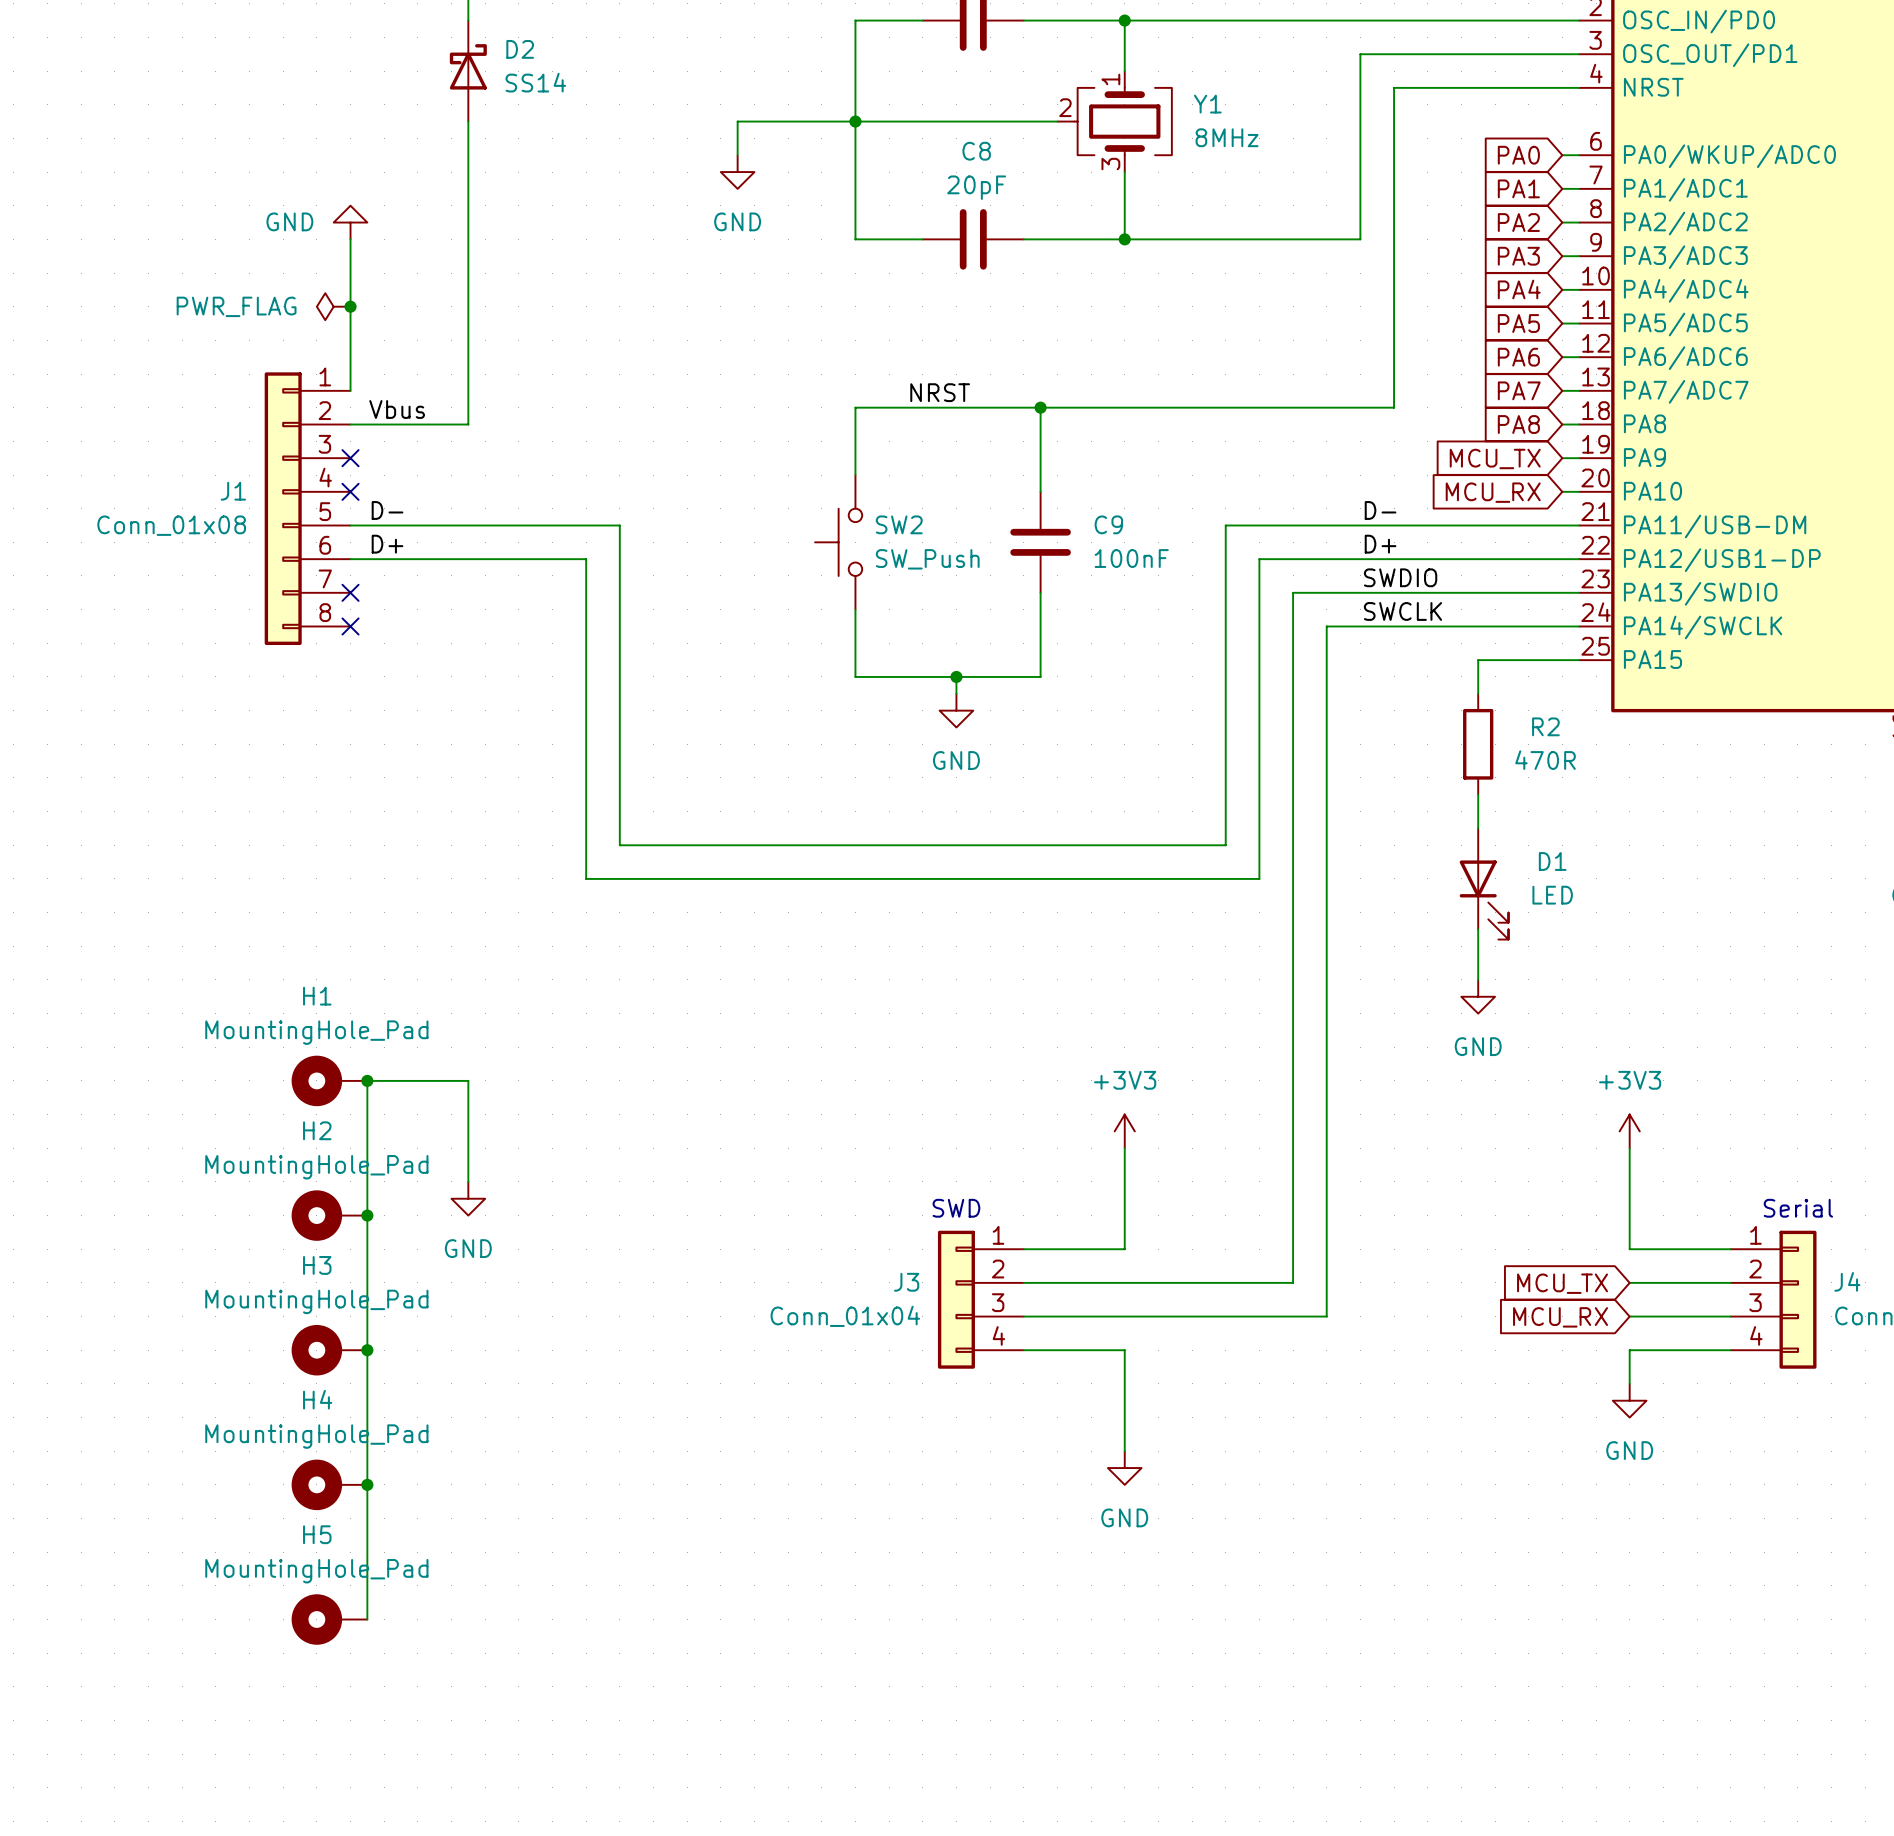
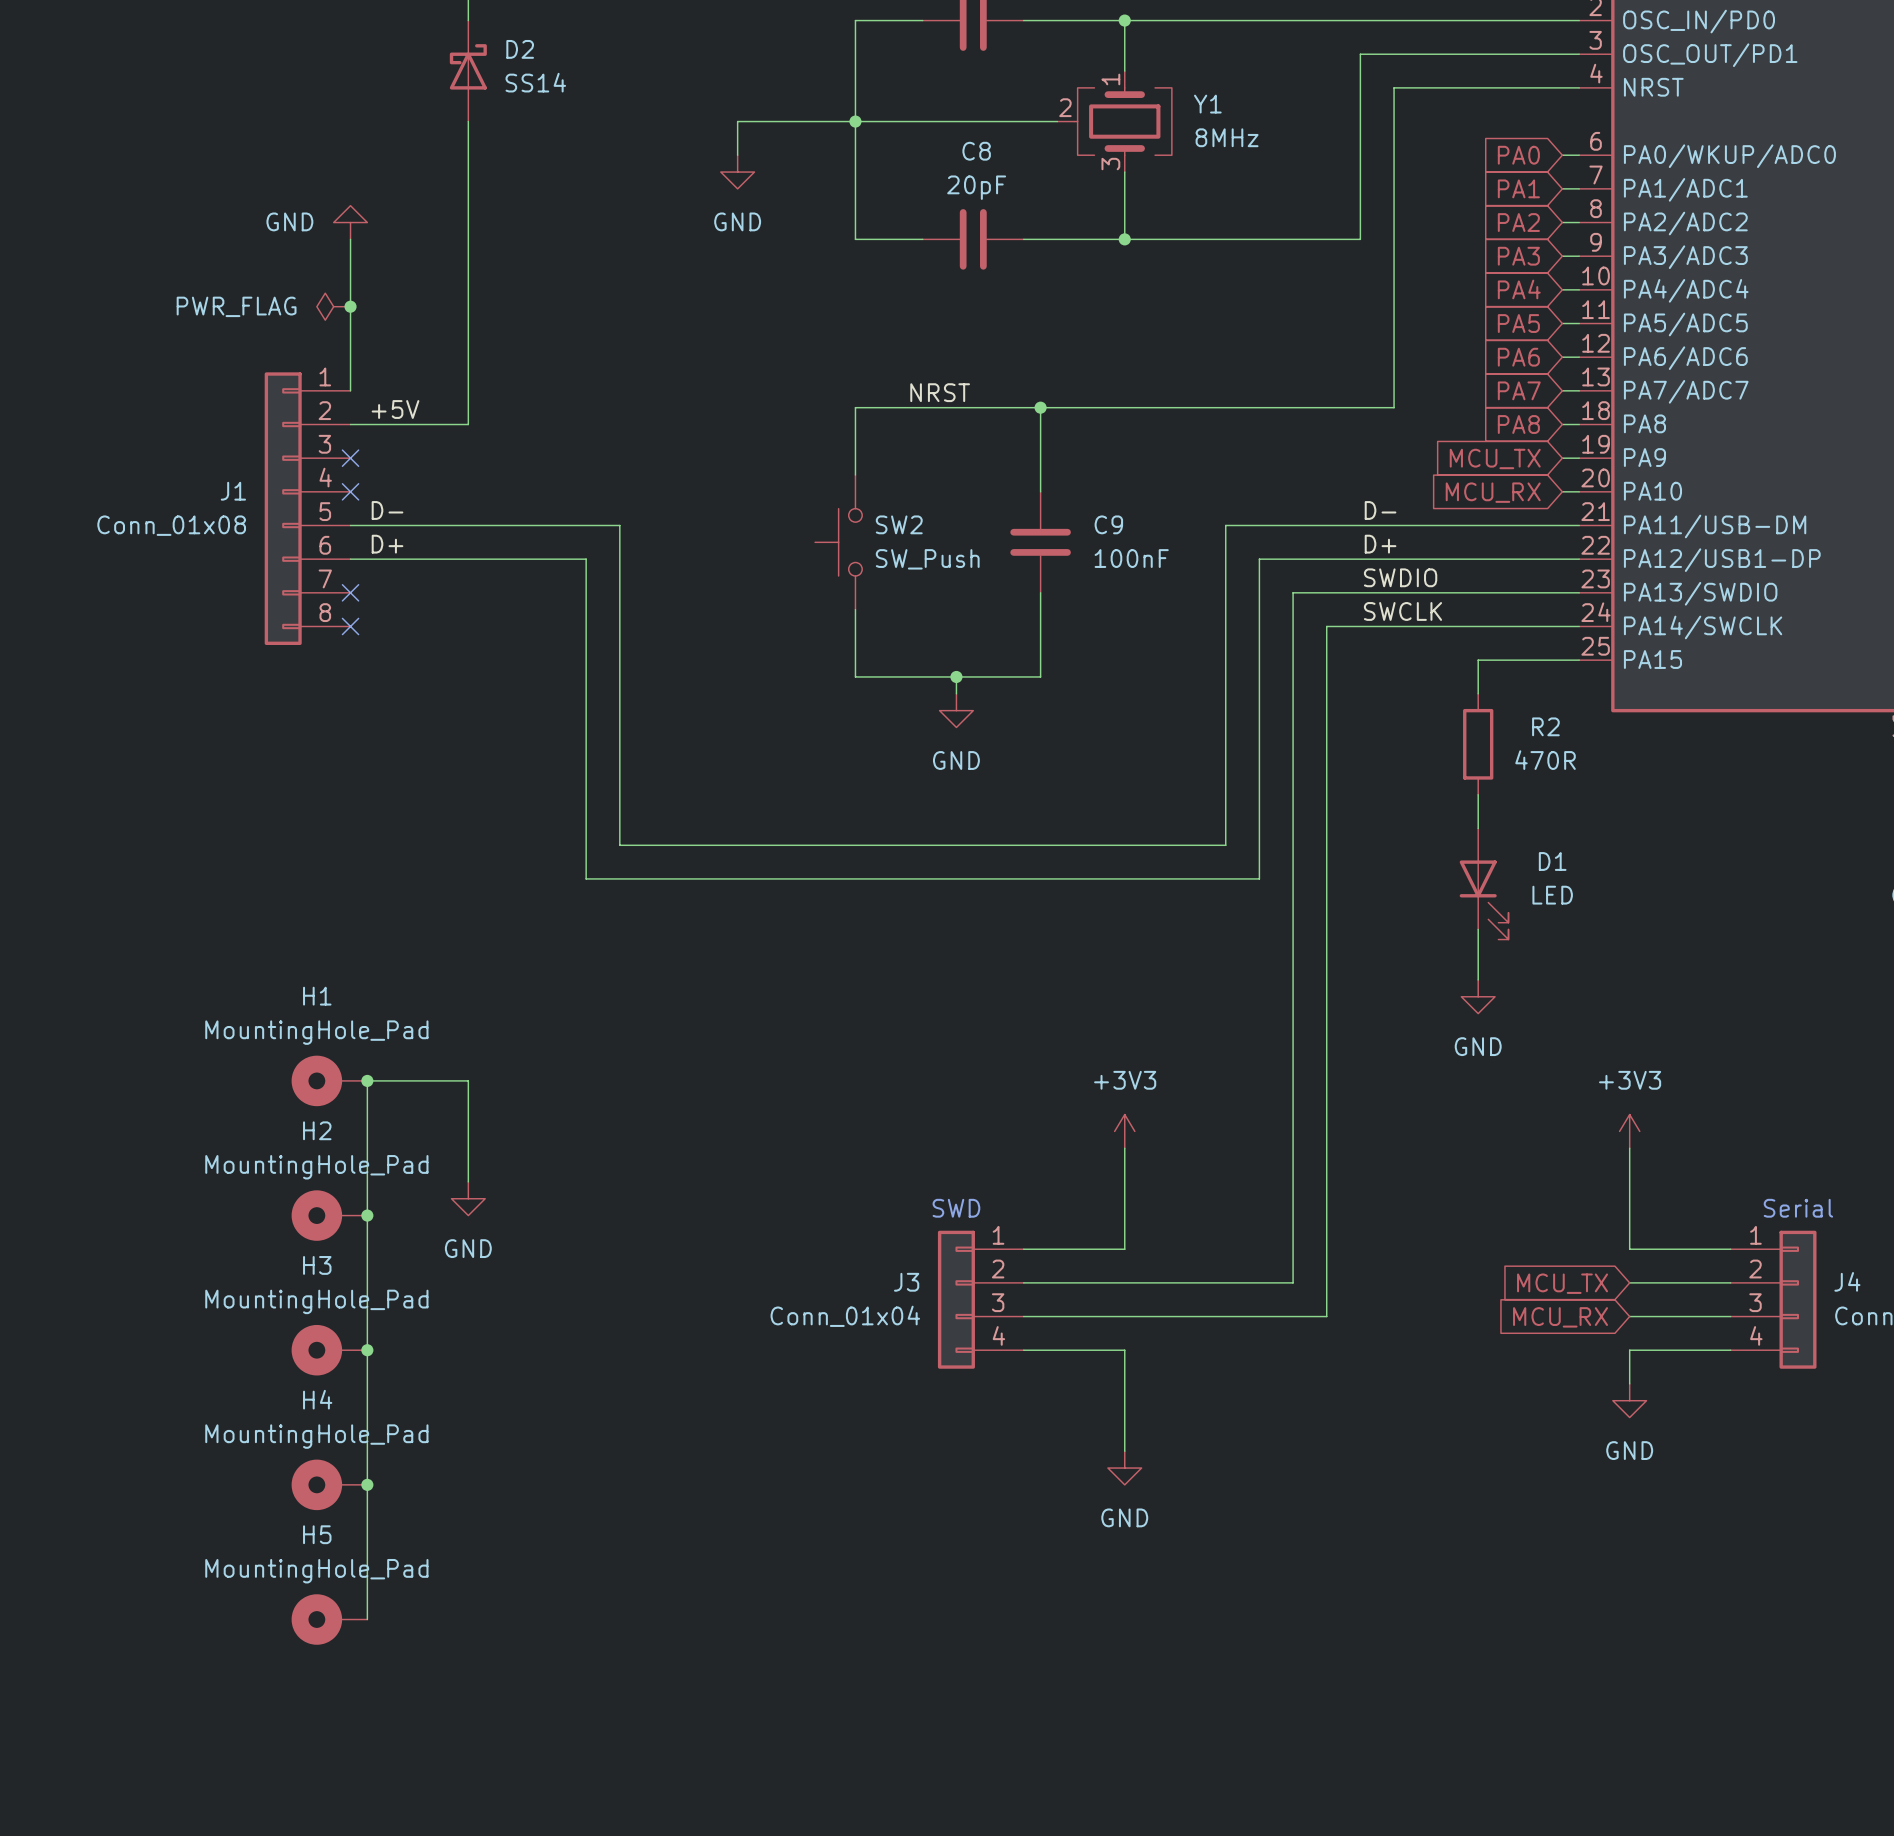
label: Vbus (397, 409) -> +5V (395, 409)

